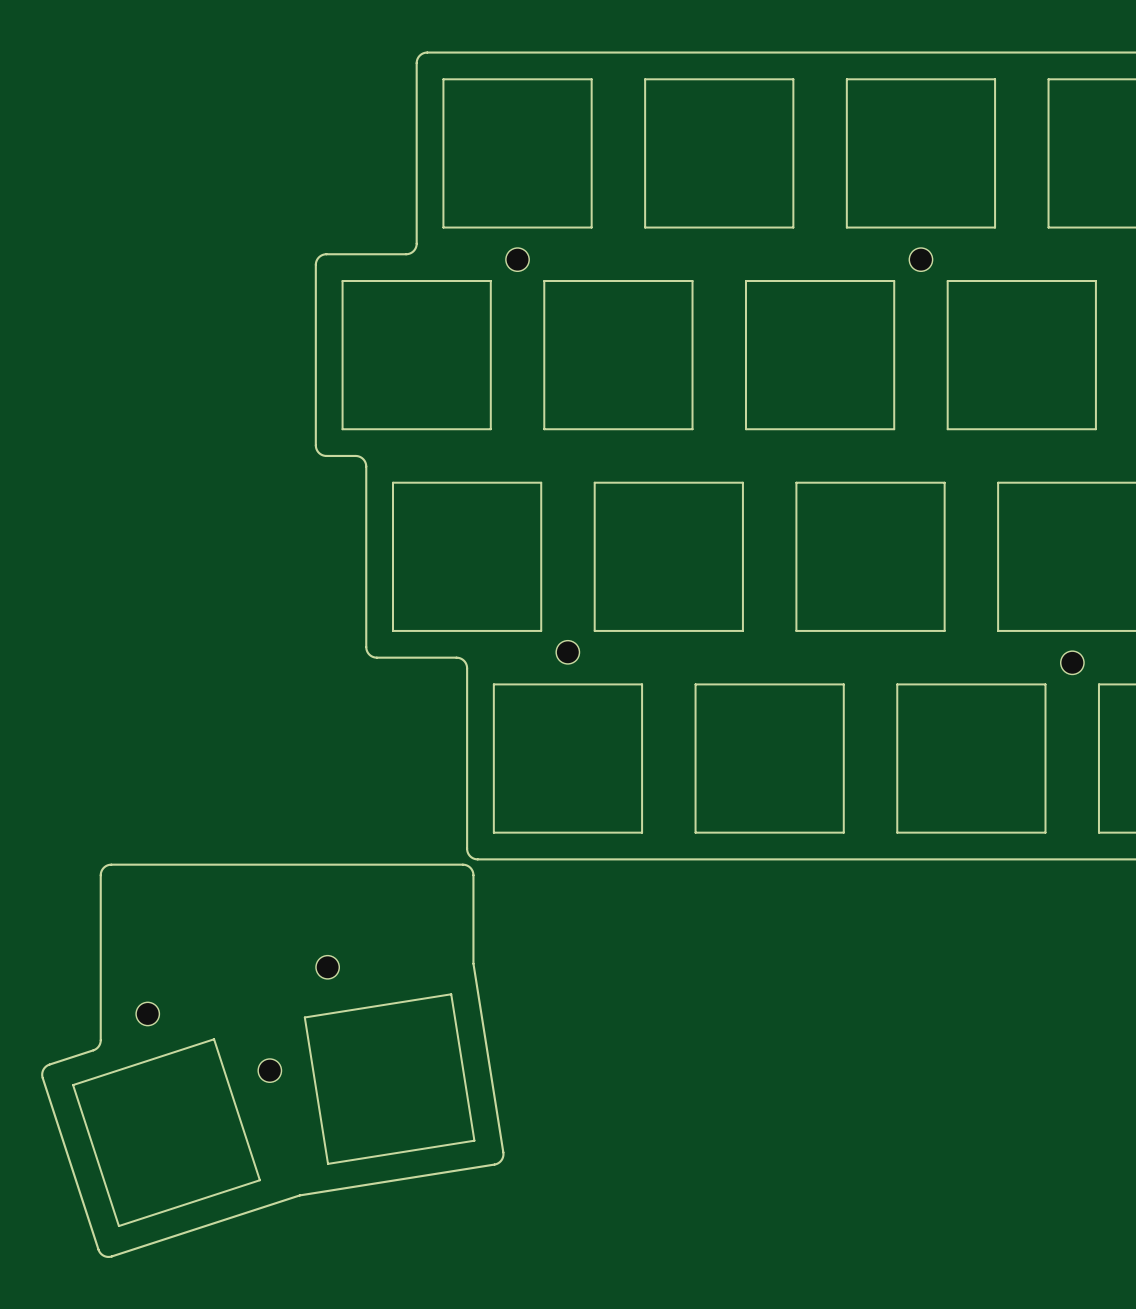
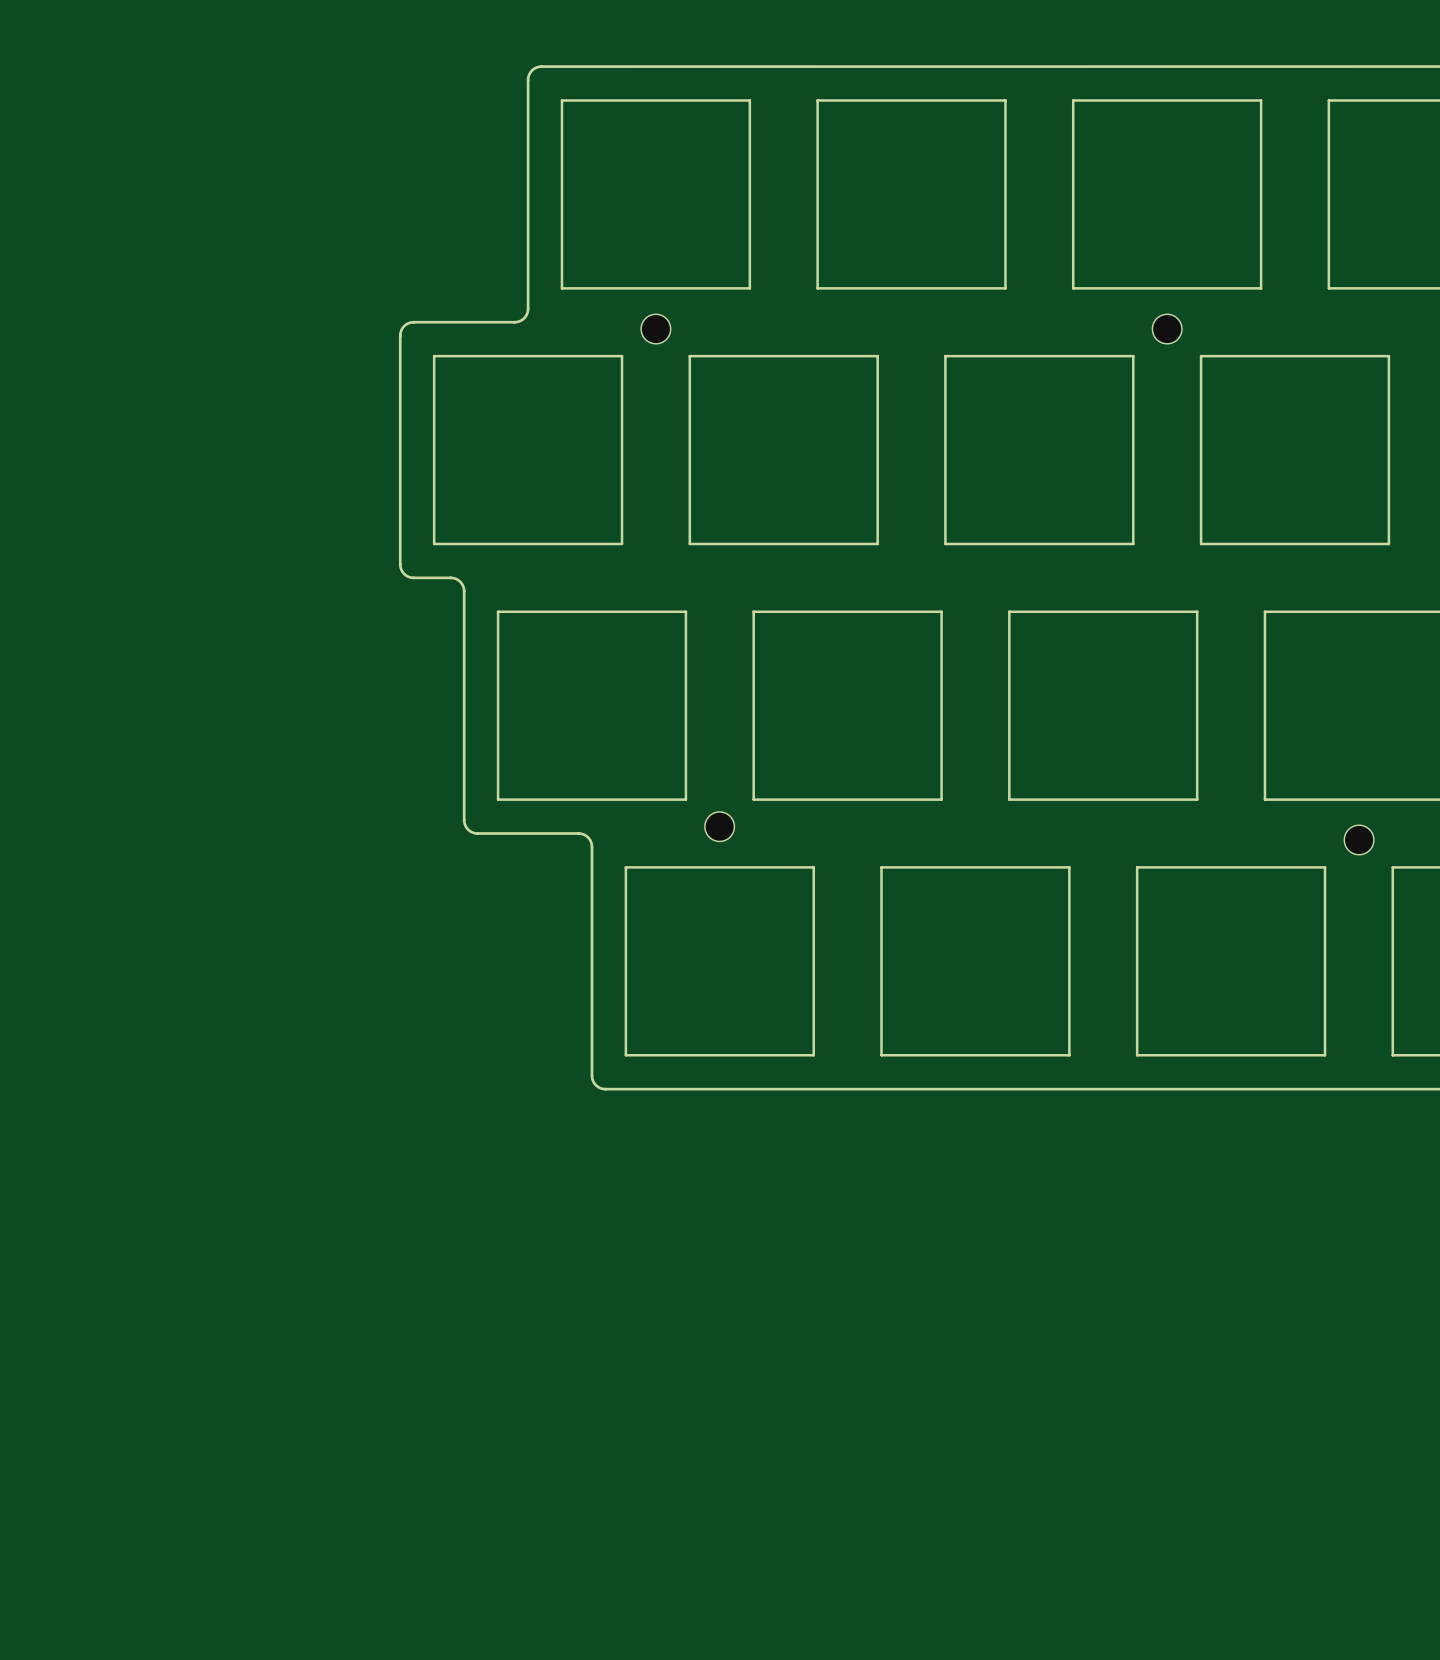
board edge: (111, 864) (462, 864) (469, 866) (473, 875) (473, 963) (503, 1152) (501, 1160) (494, 1164) (299, 1195) (111, 1256) (102, 1255) (98, 1249) (42, 1073) (48, 1065) (94, 1049) (100, 1044) (100, 874) (103, 867) (111, 864) -> none
part: (327, 967) -> none
board edge: (451, 994) (474, 1140) (328, 1163) (304, 1017) (451, 994) -> none
part: (147, 1013) -> none
board edge: (214, 1039) (73, 1085) (118, 1226) (259, 1180) (214, 1039) -> none
part: (269, 1070) -> none

